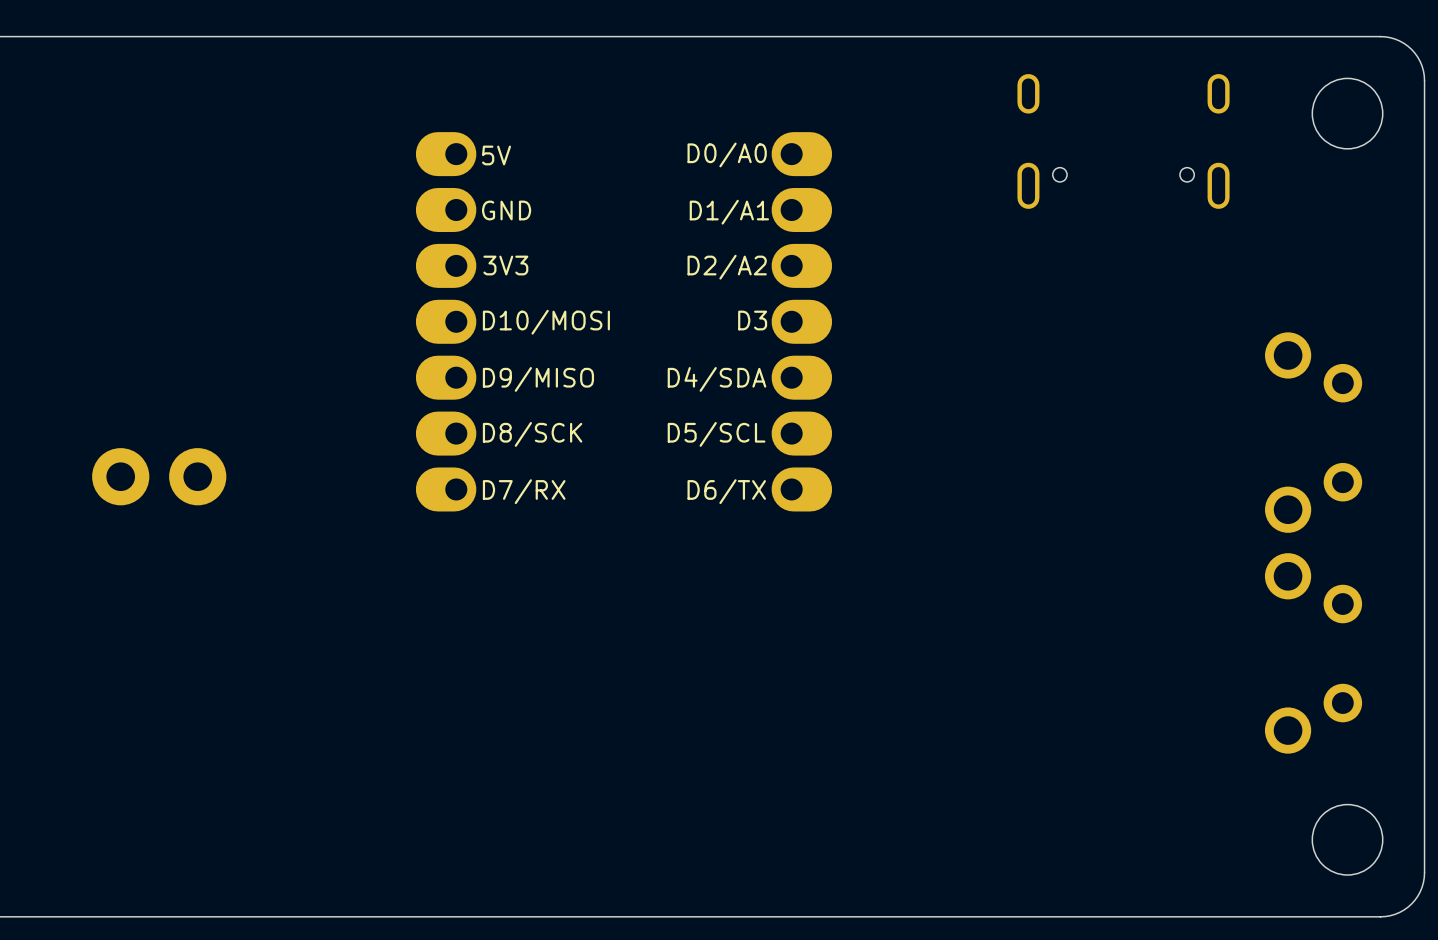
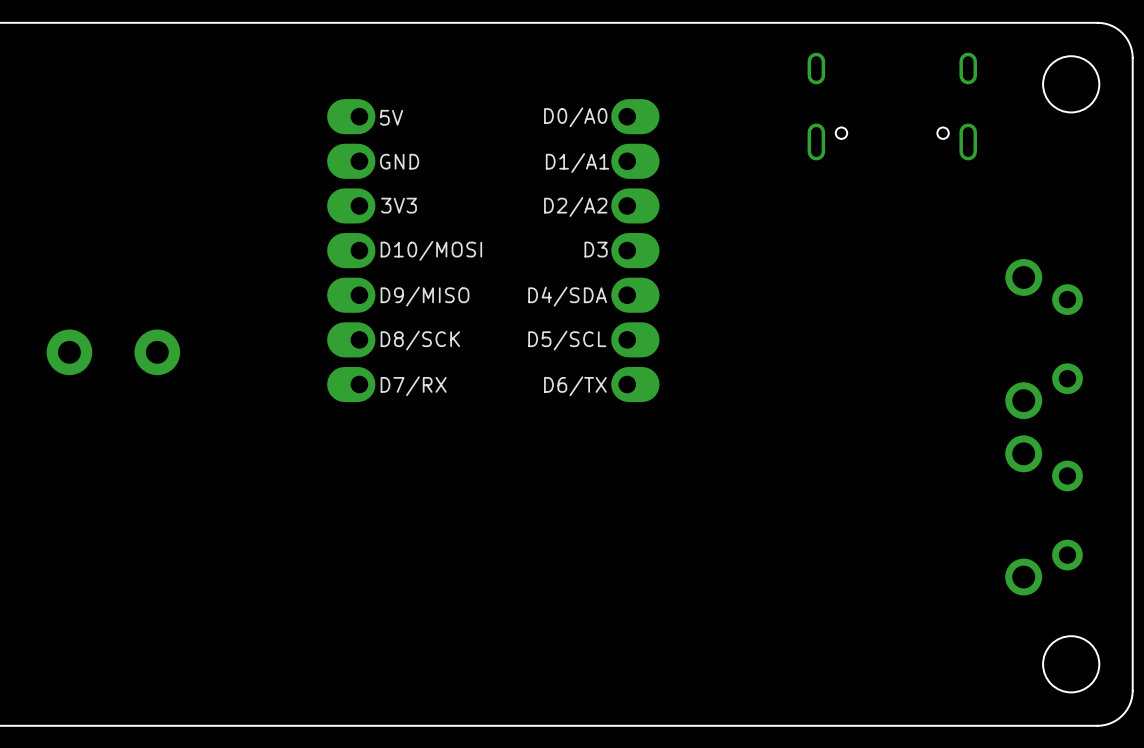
part: none -> (113, 352)
part: (159, 476) -> none

